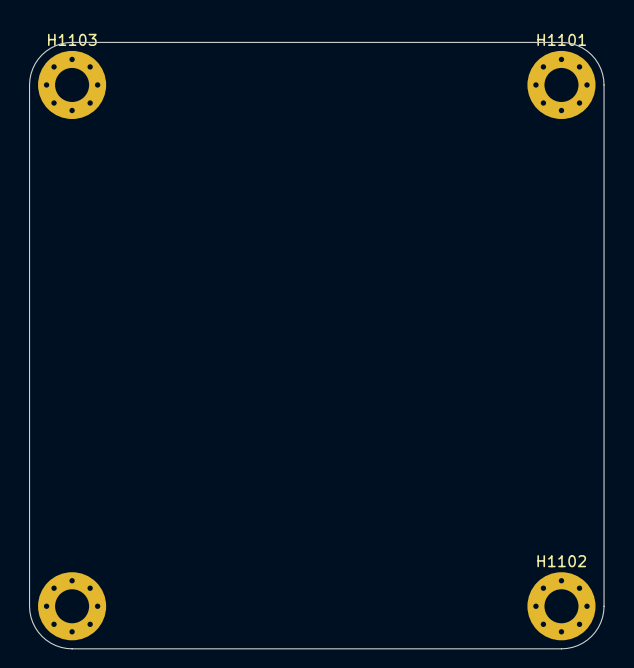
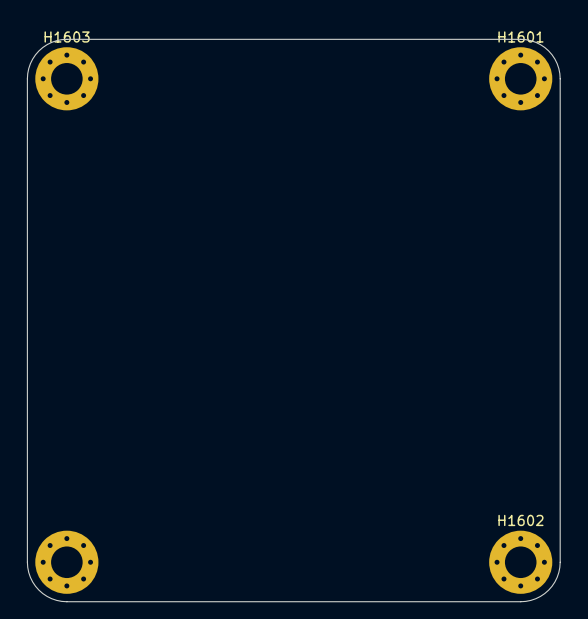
H1103 name: H1103 (72, 39) -> H1603 (67, 36)
H1101 name: H1101 (561, 39) -> H1601 (520, 36)
H1102 name: H1102 (561, 561) -> H1602 (520, 520)

